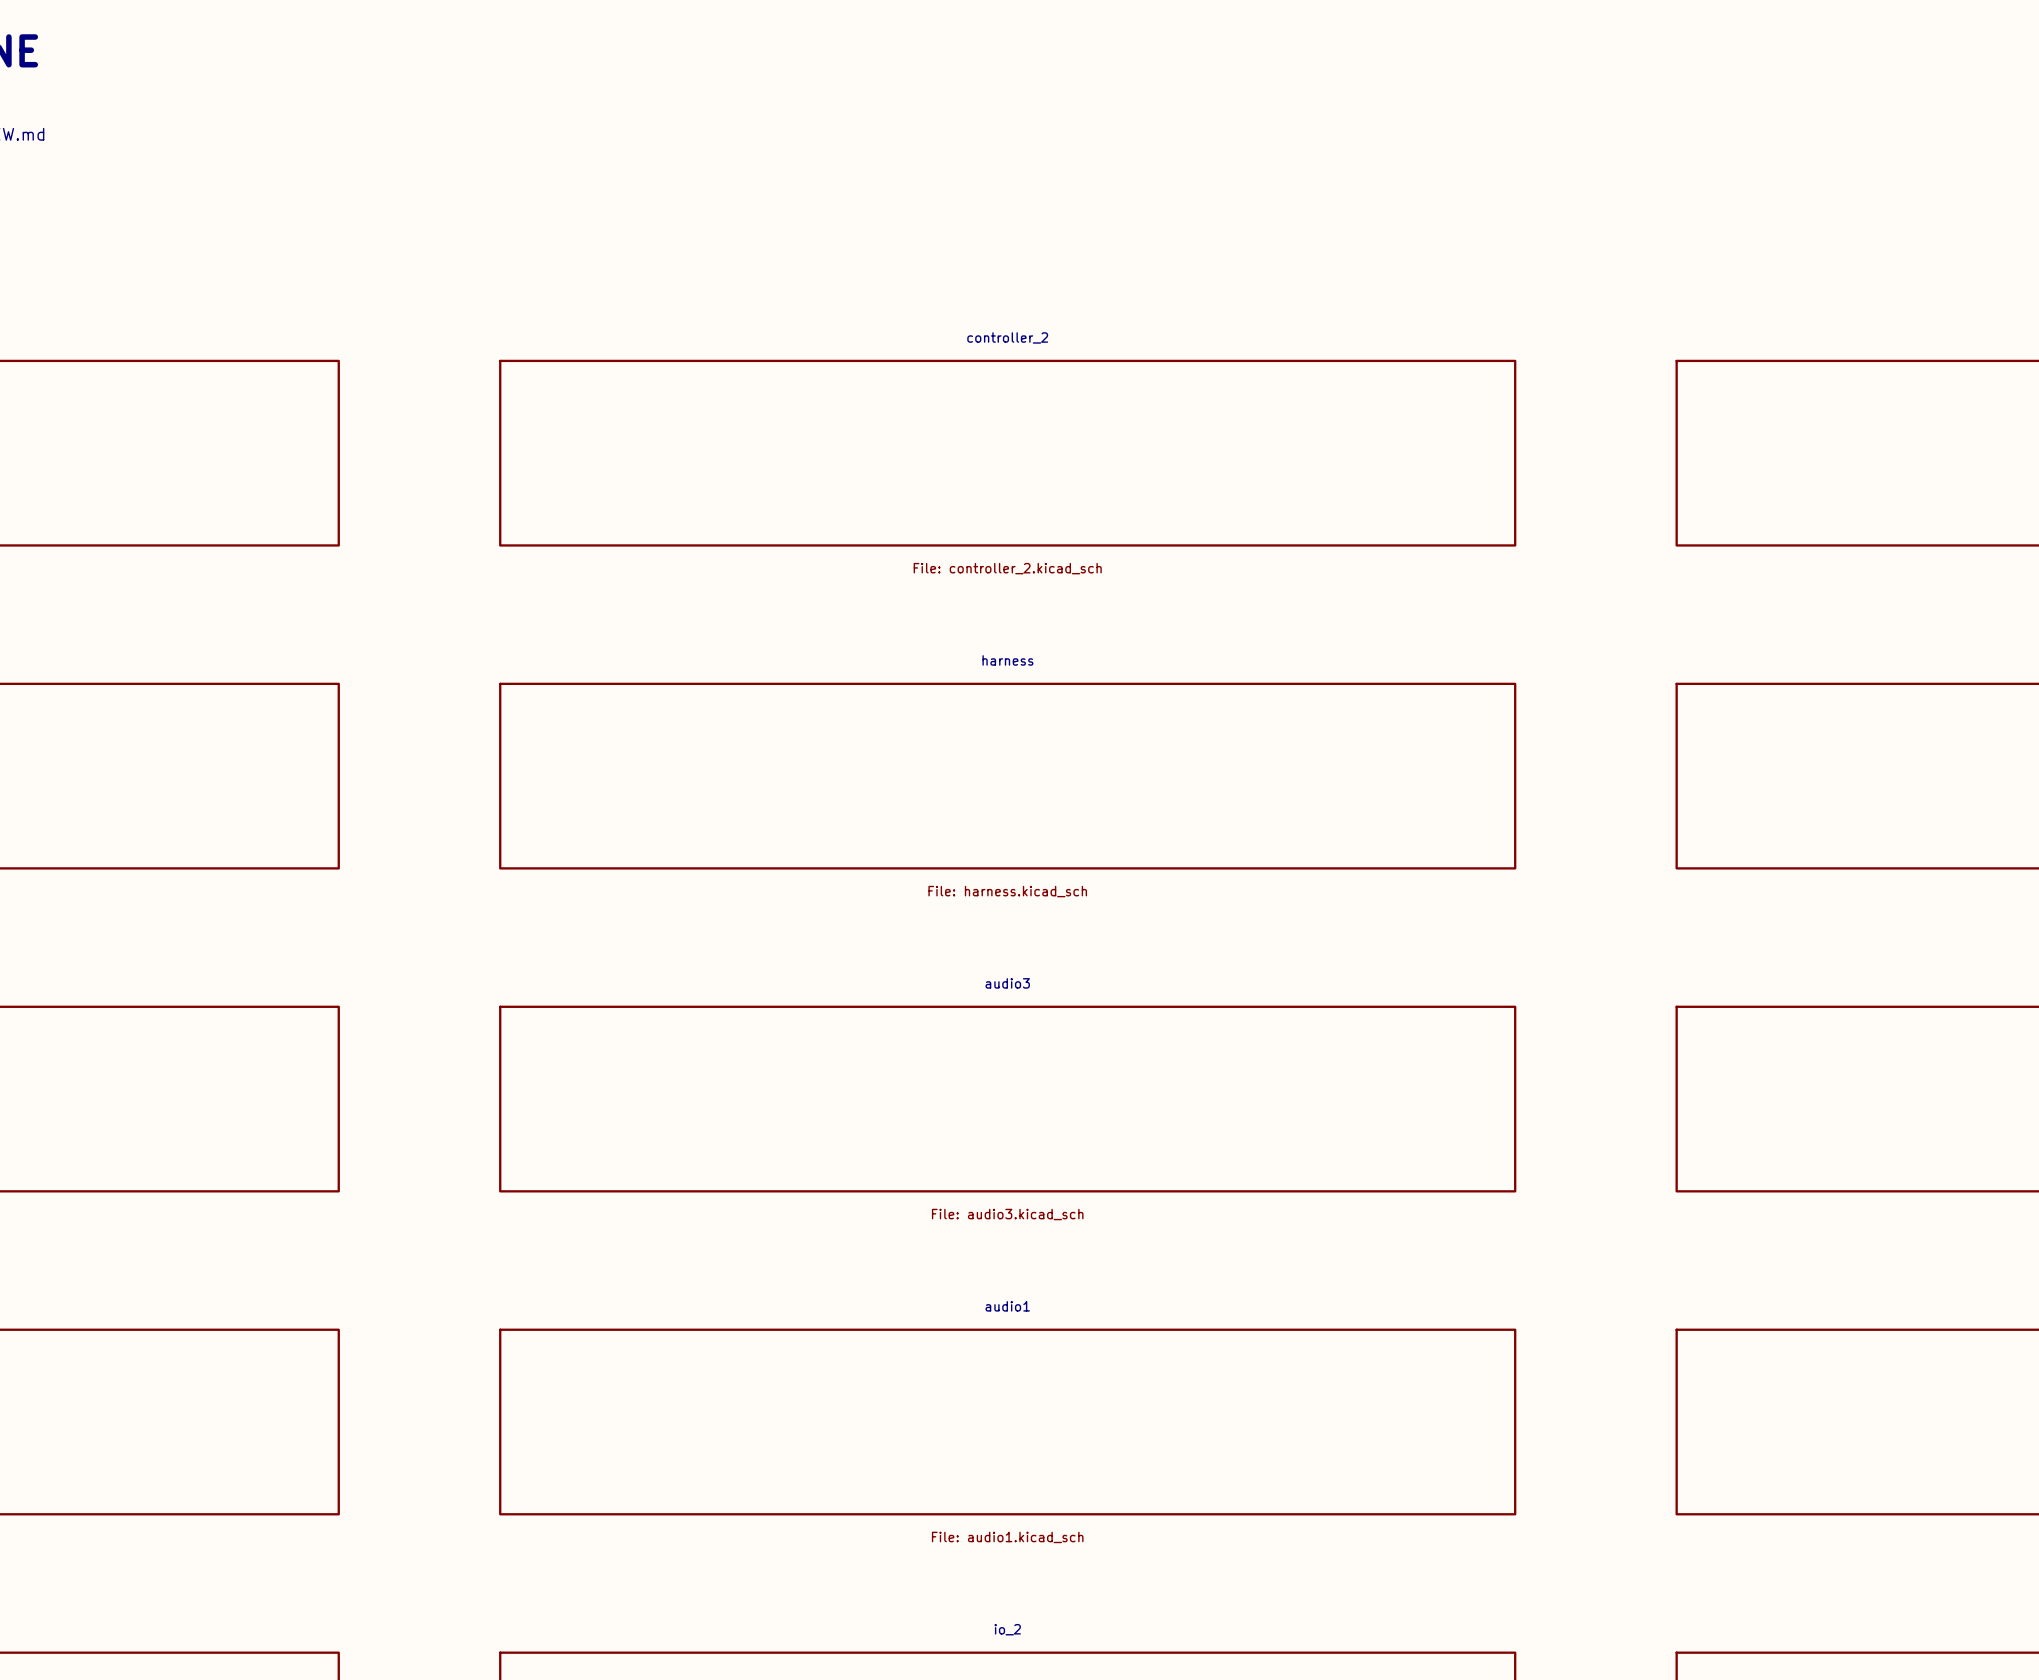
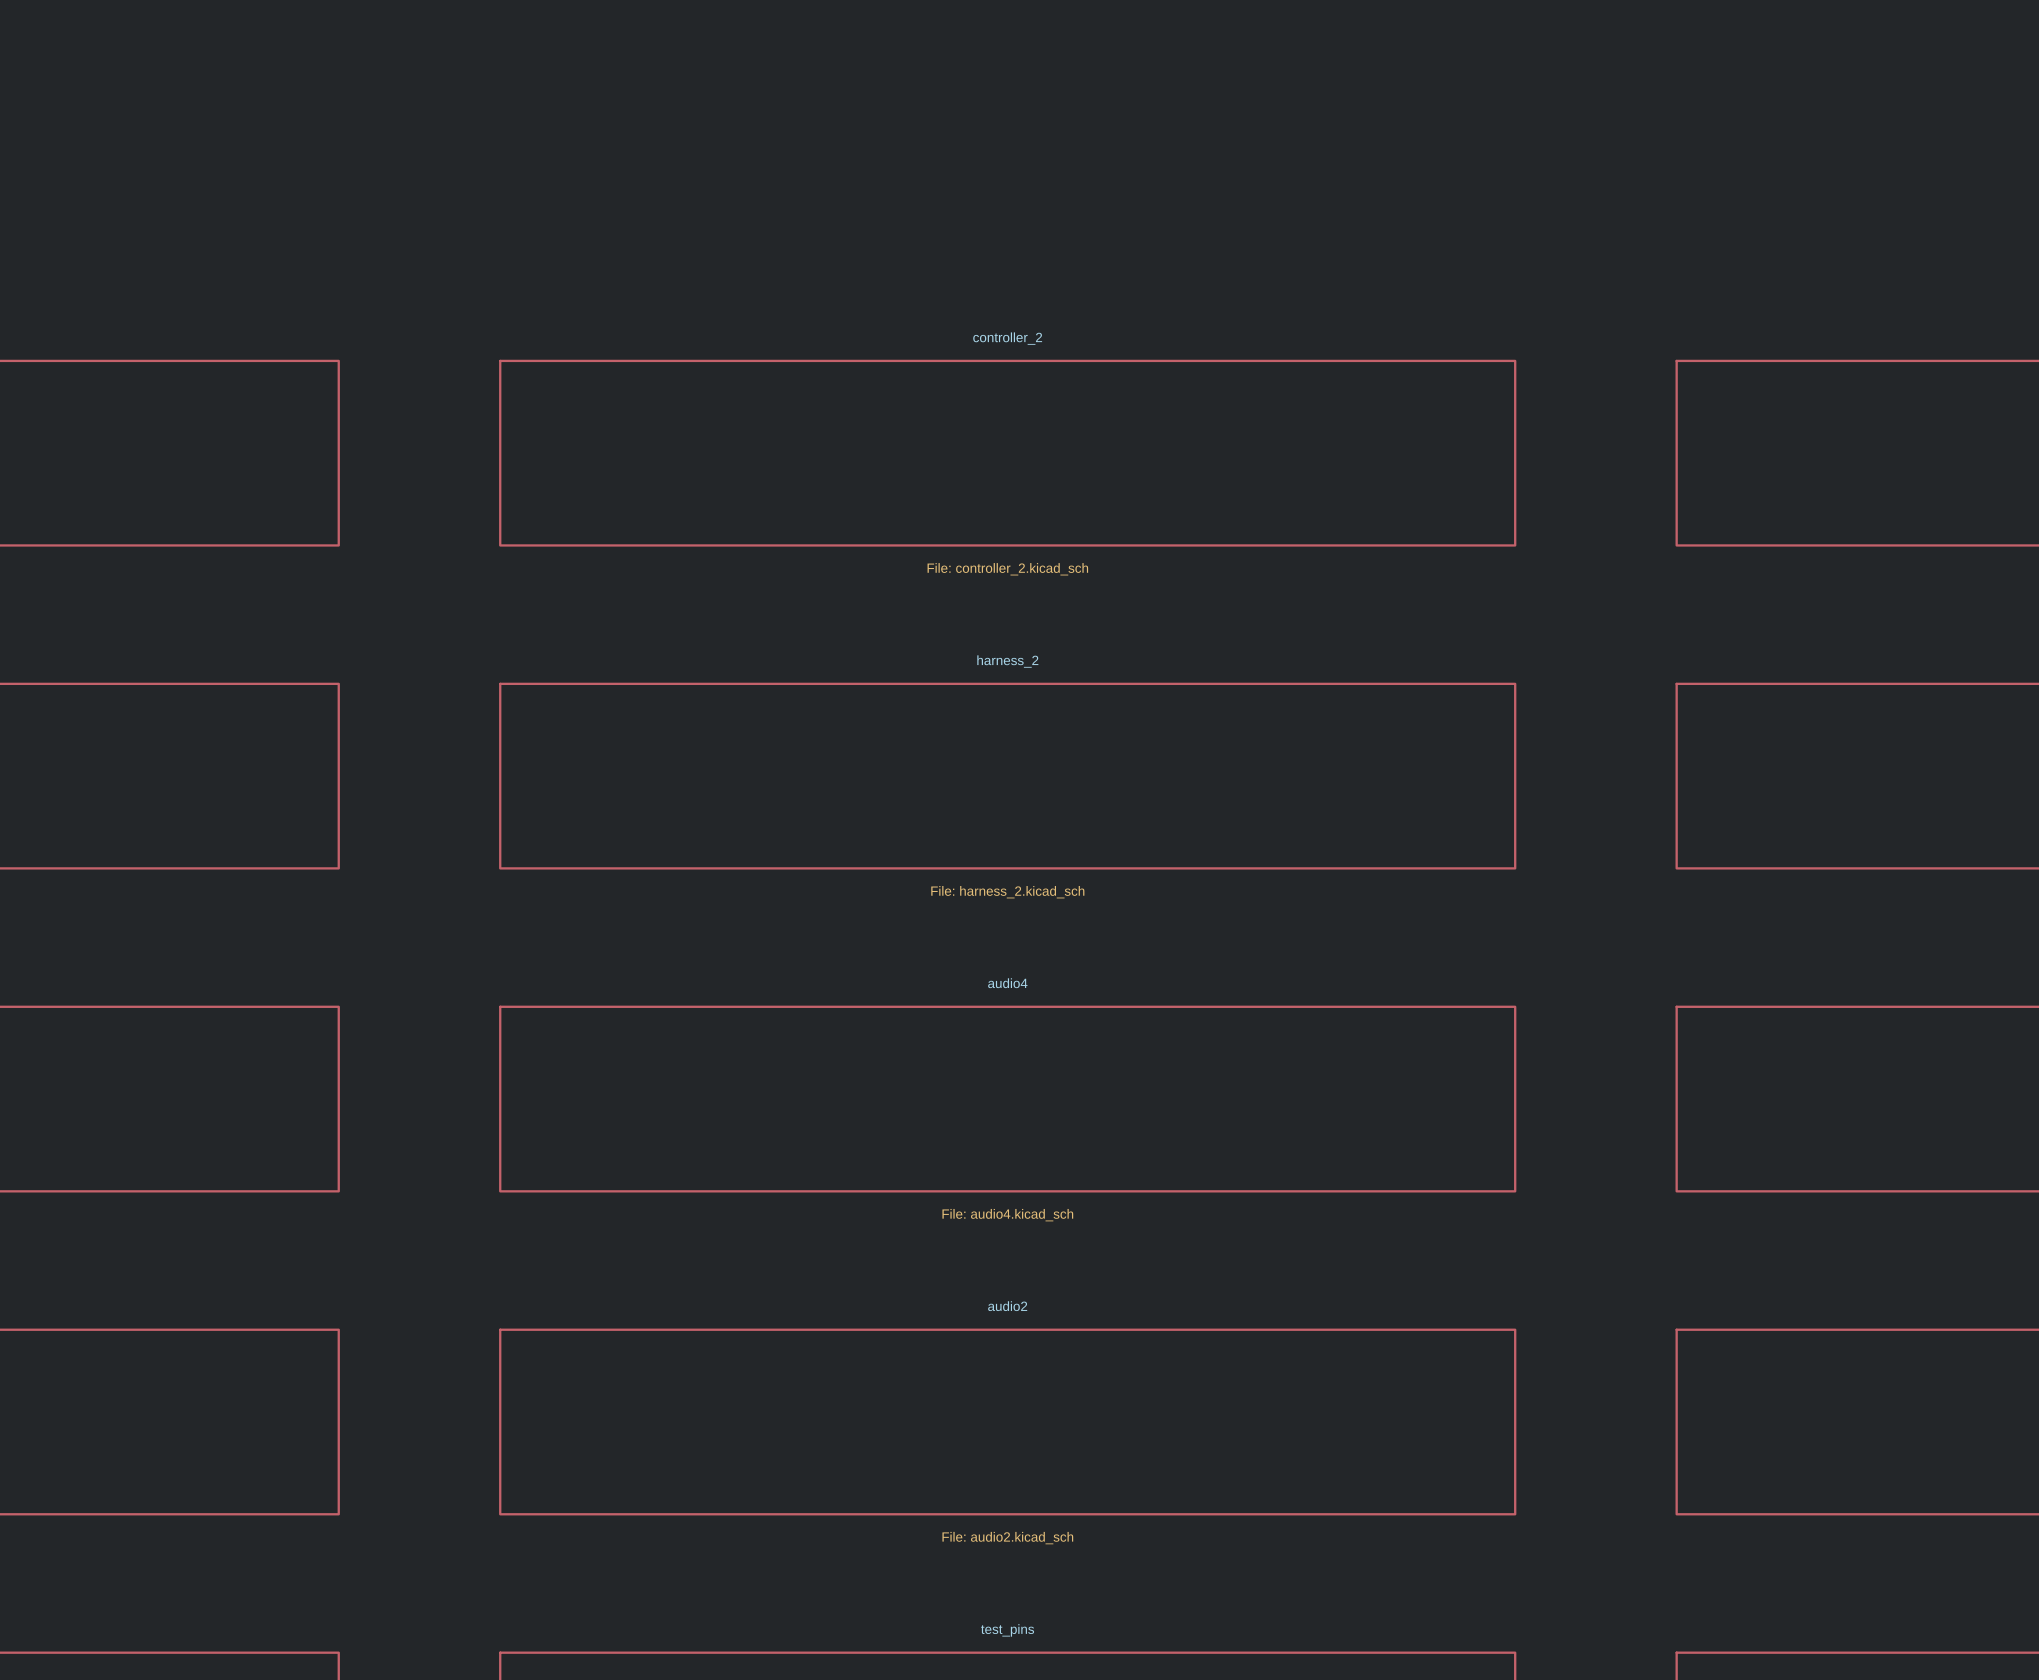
sheet harness name: harness (1007, 660) -> harness_2 (1007, 661)
sheet harness value: File: harness.kicad_sch (1007, 891) -> File: harness_2.kicad_sch (1007, 892)
sheet audio3 name: audio3 (1007, 983) -> audio4 (1007, 983)
sheet audio3 value: File: audio3.kicad_sch (1007, 1214) -> File: audio4.kicad_sch (1007, 1215)
sheet audio1 name: audio1 (1007, 1306) -> audio2 (1007, 1306)
sheet audio1 value: File: audio1.kicad_sch (1007, 1537) -> File: audio2.kicad_sch (1007, 1538)
sheet io_2 name: io_2 (1007, 1629) -> test_pins (1007, 1630)

